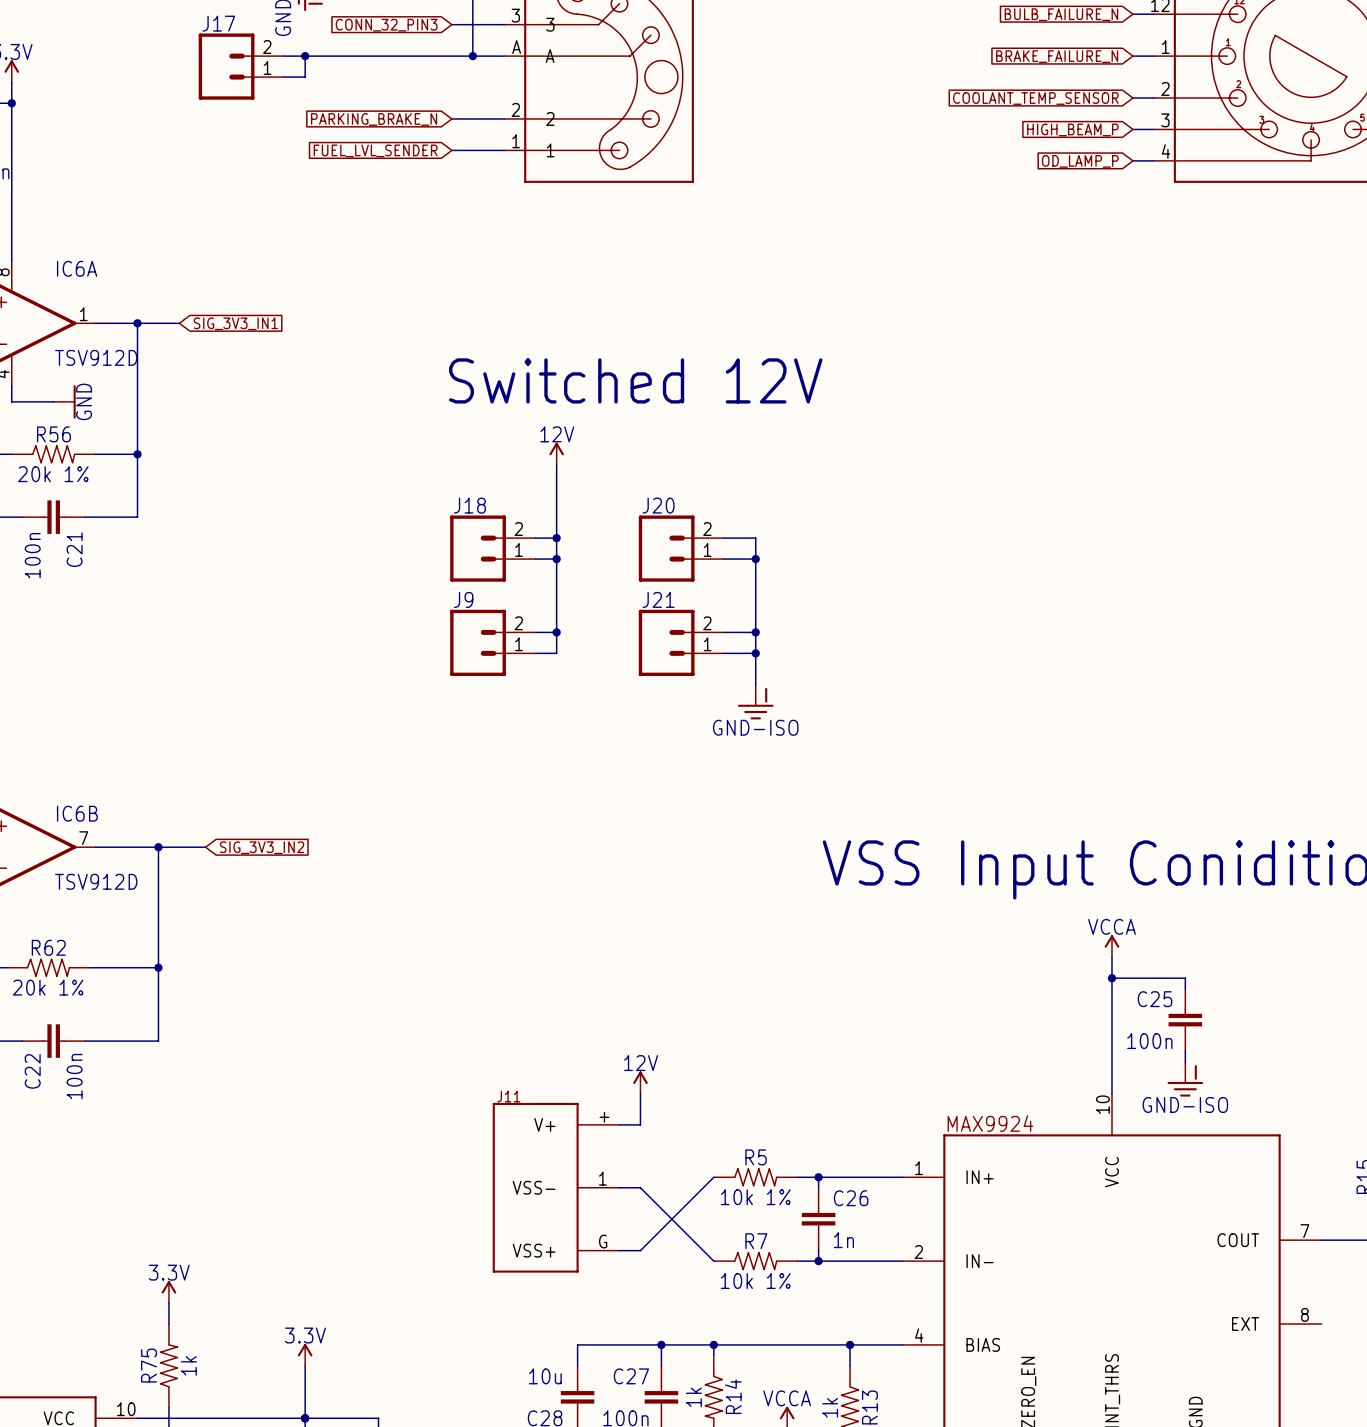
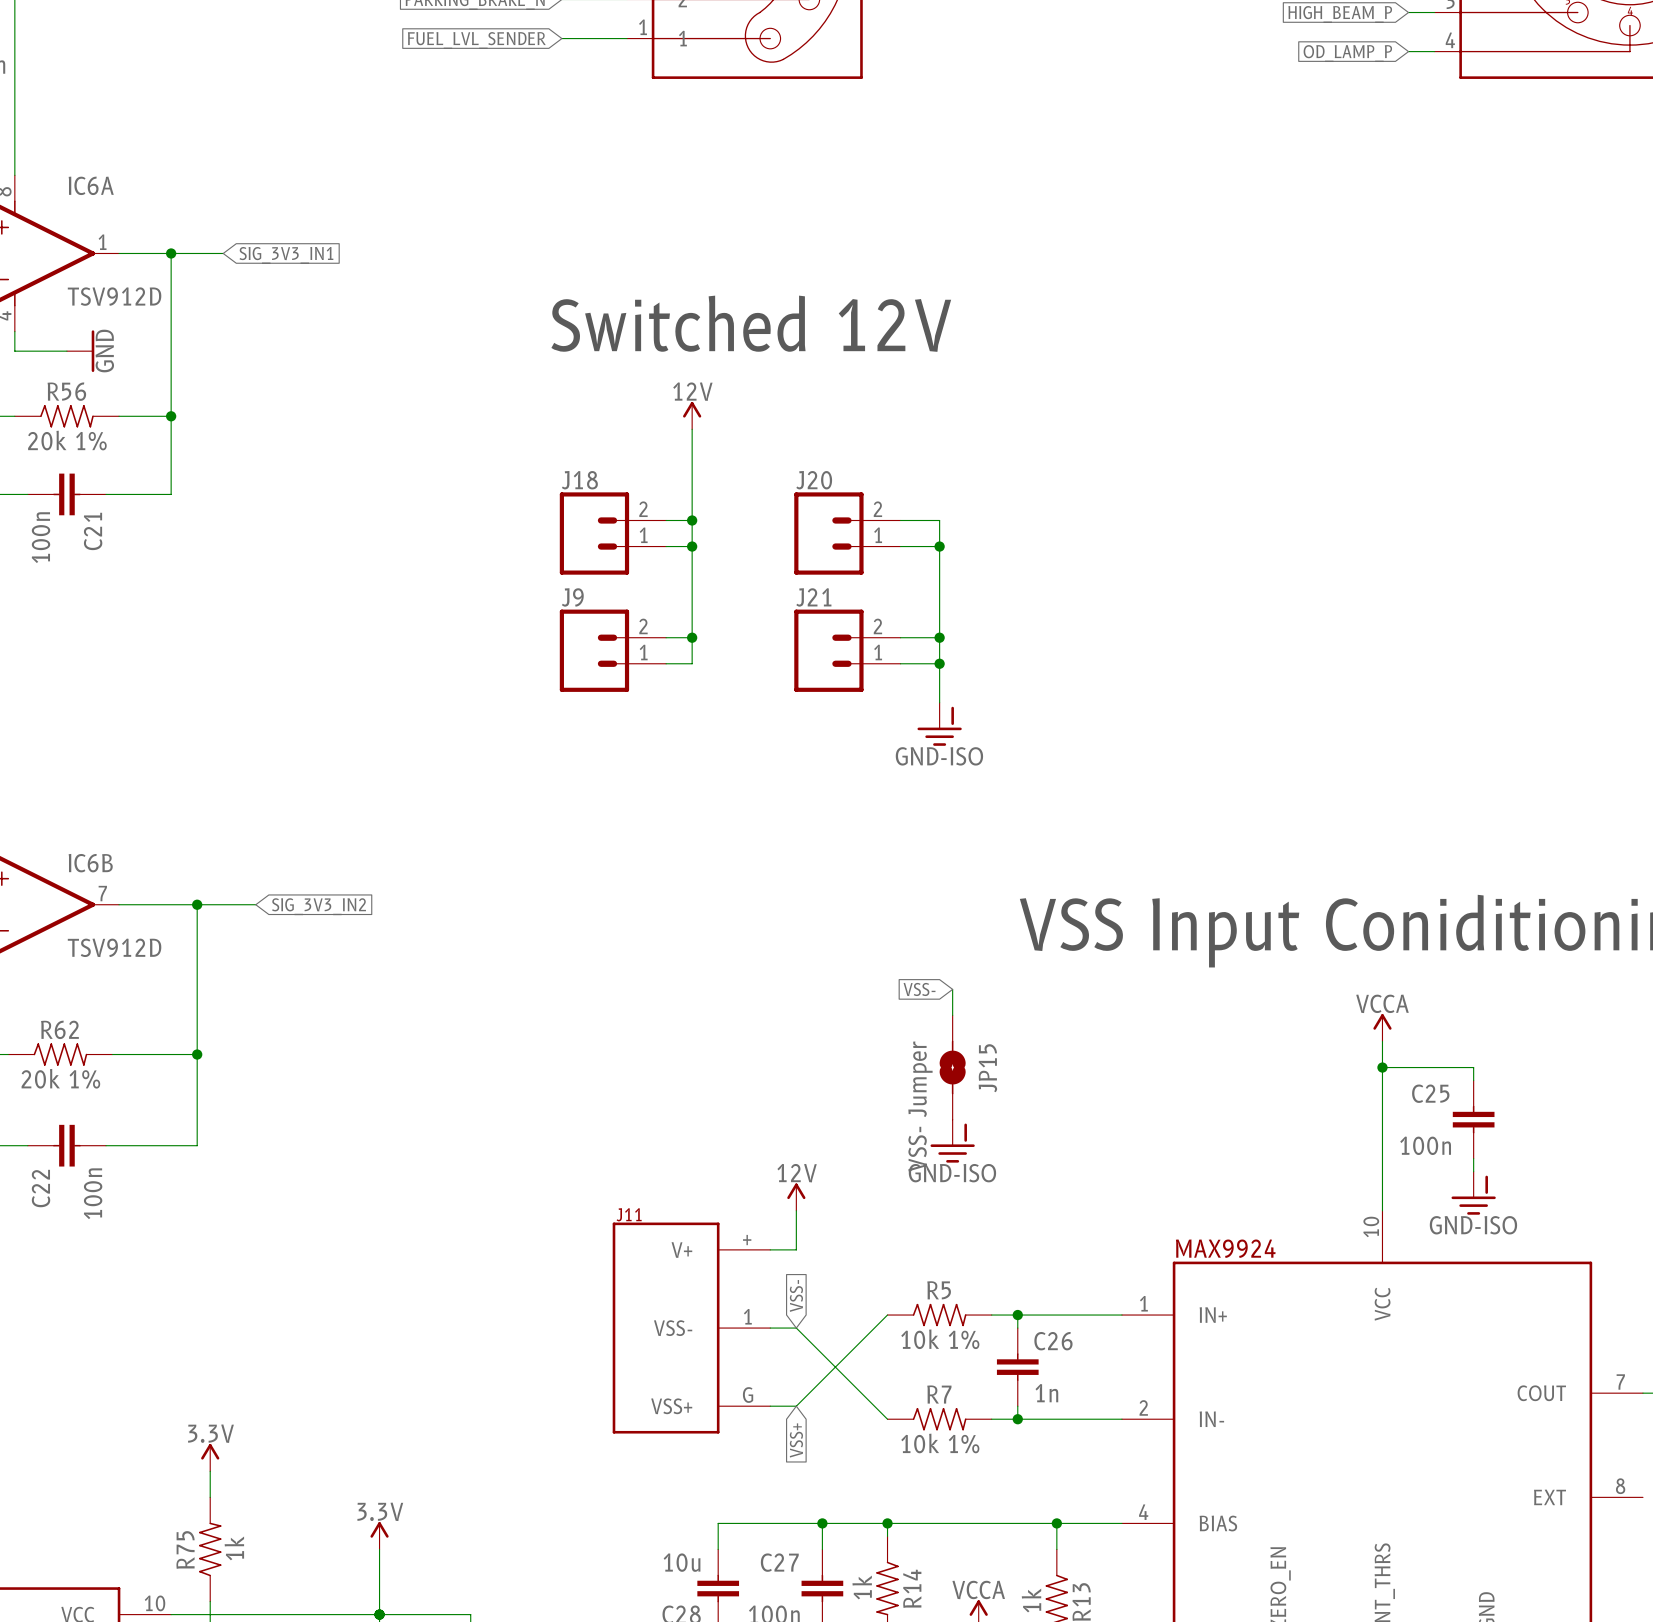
global label: none -> VSS- (919, 989)
wire: none -> (952, 989) (952, 1015)
JP15: none -> VSS- Jumper (952, 1067)
power symbol: none -> GND-ISO (952, 1141)
global label: none -> VSS- (796, 1295)
global label: none -> VSS+ (796, 1440)

